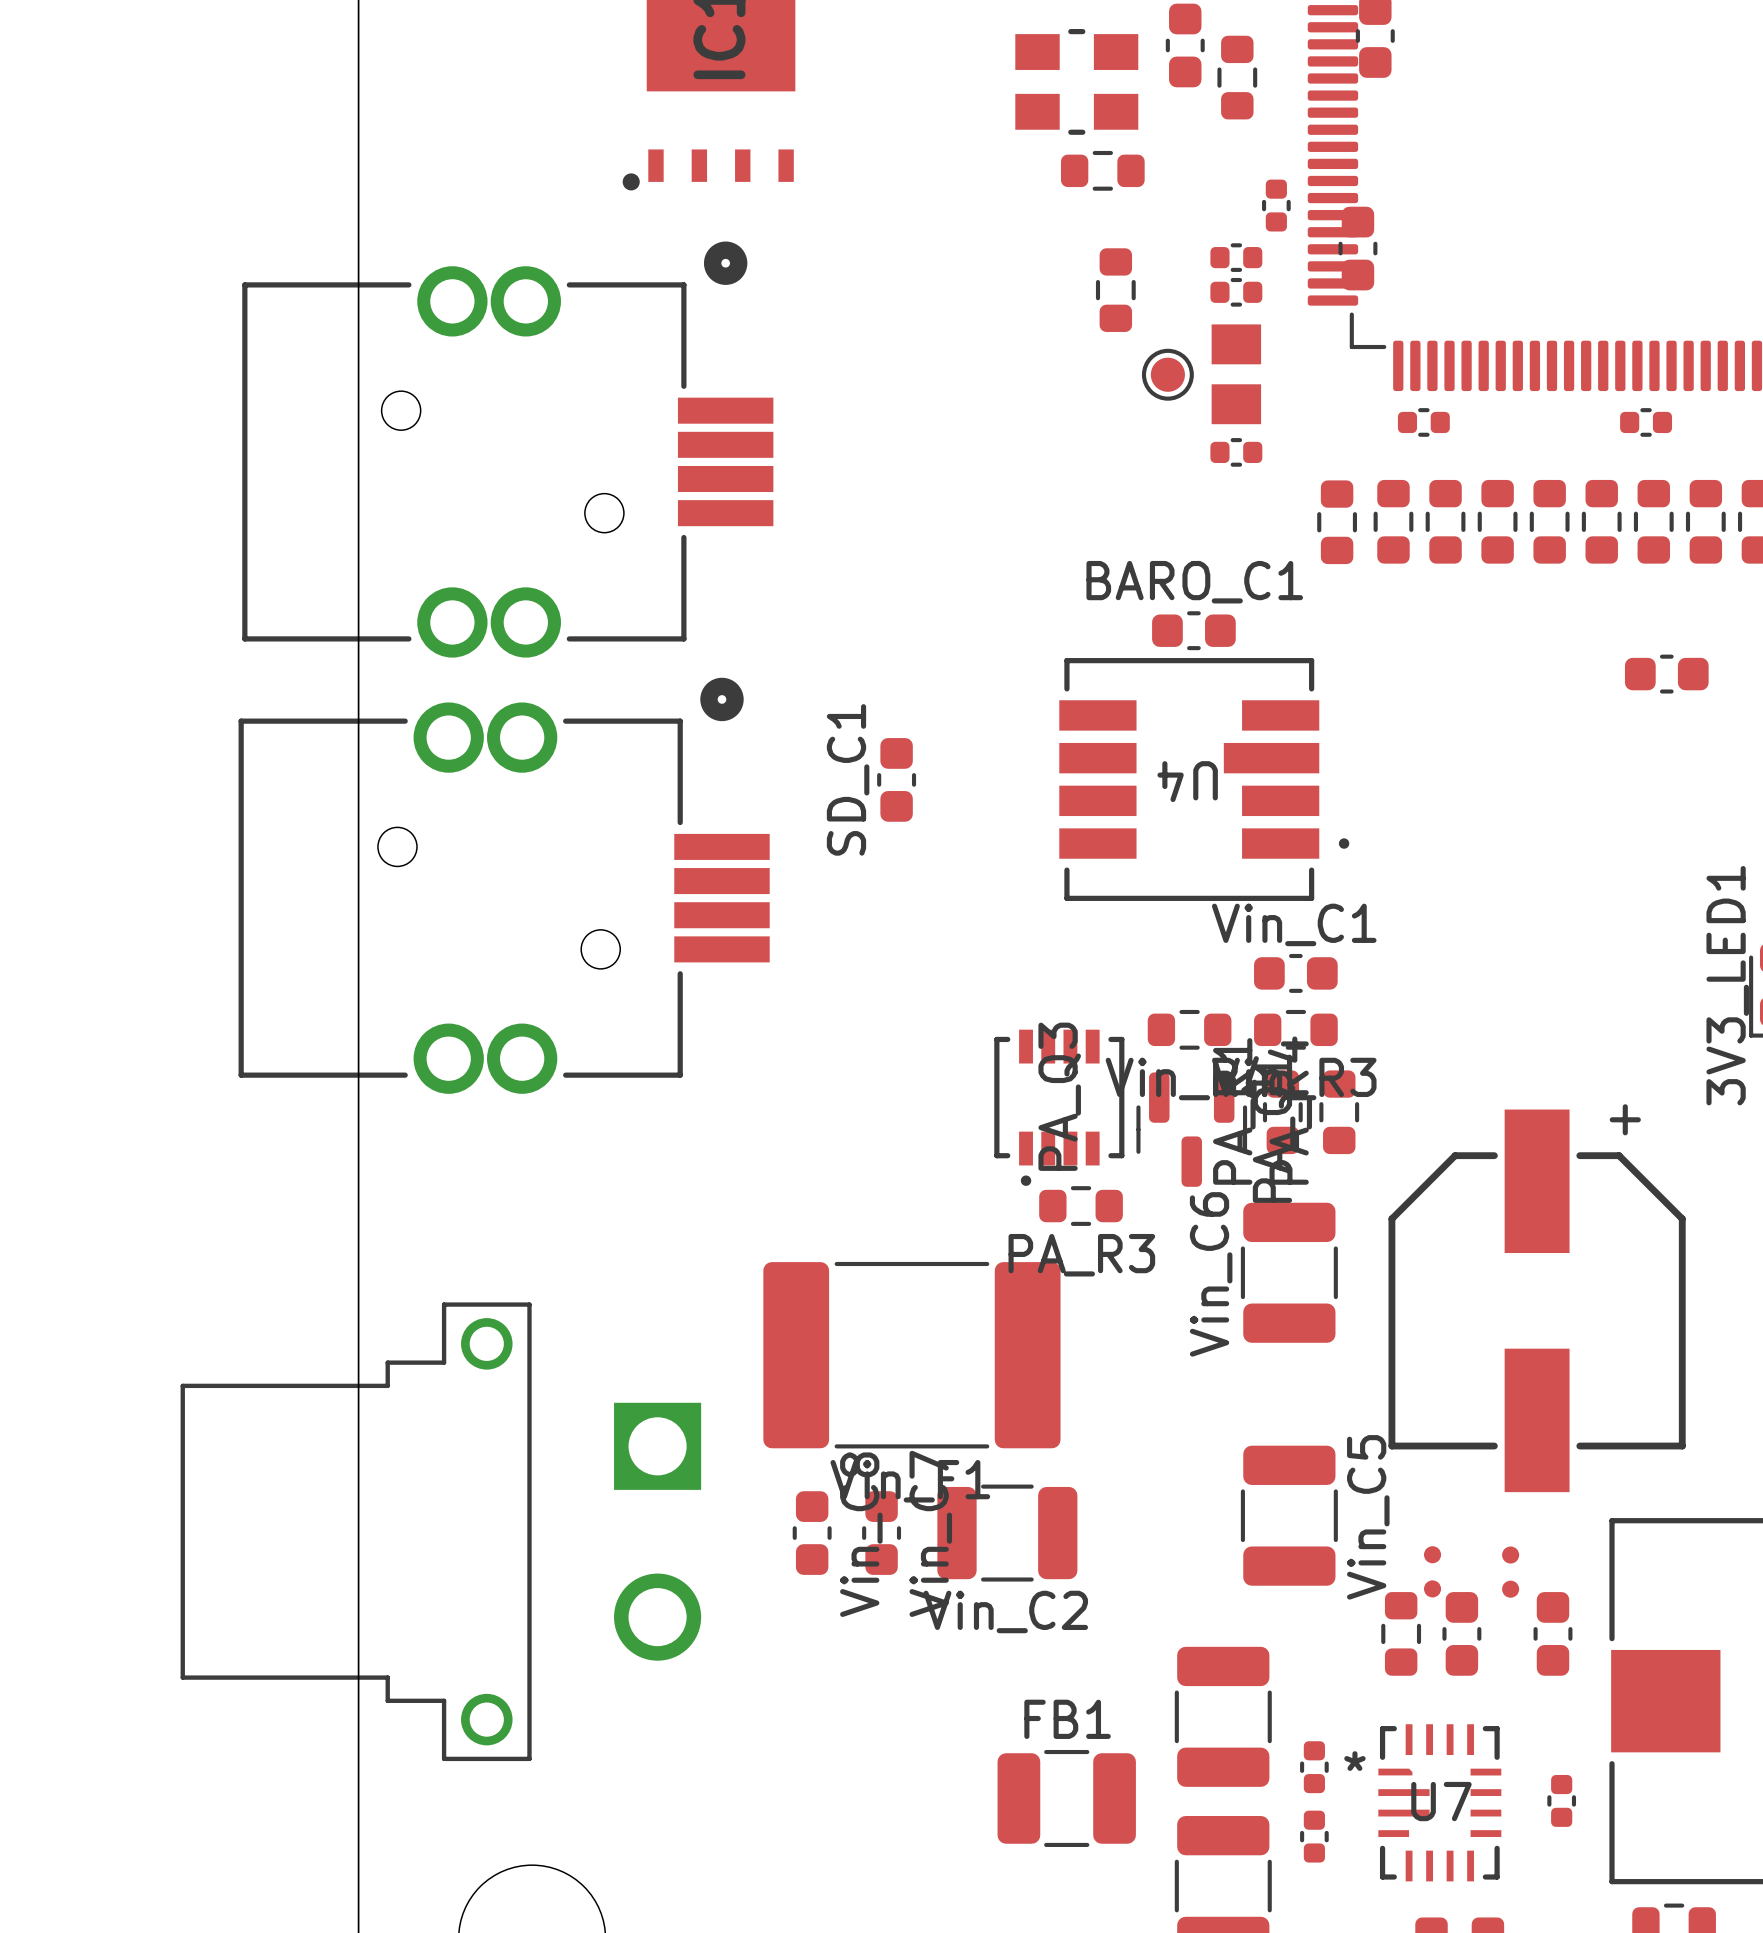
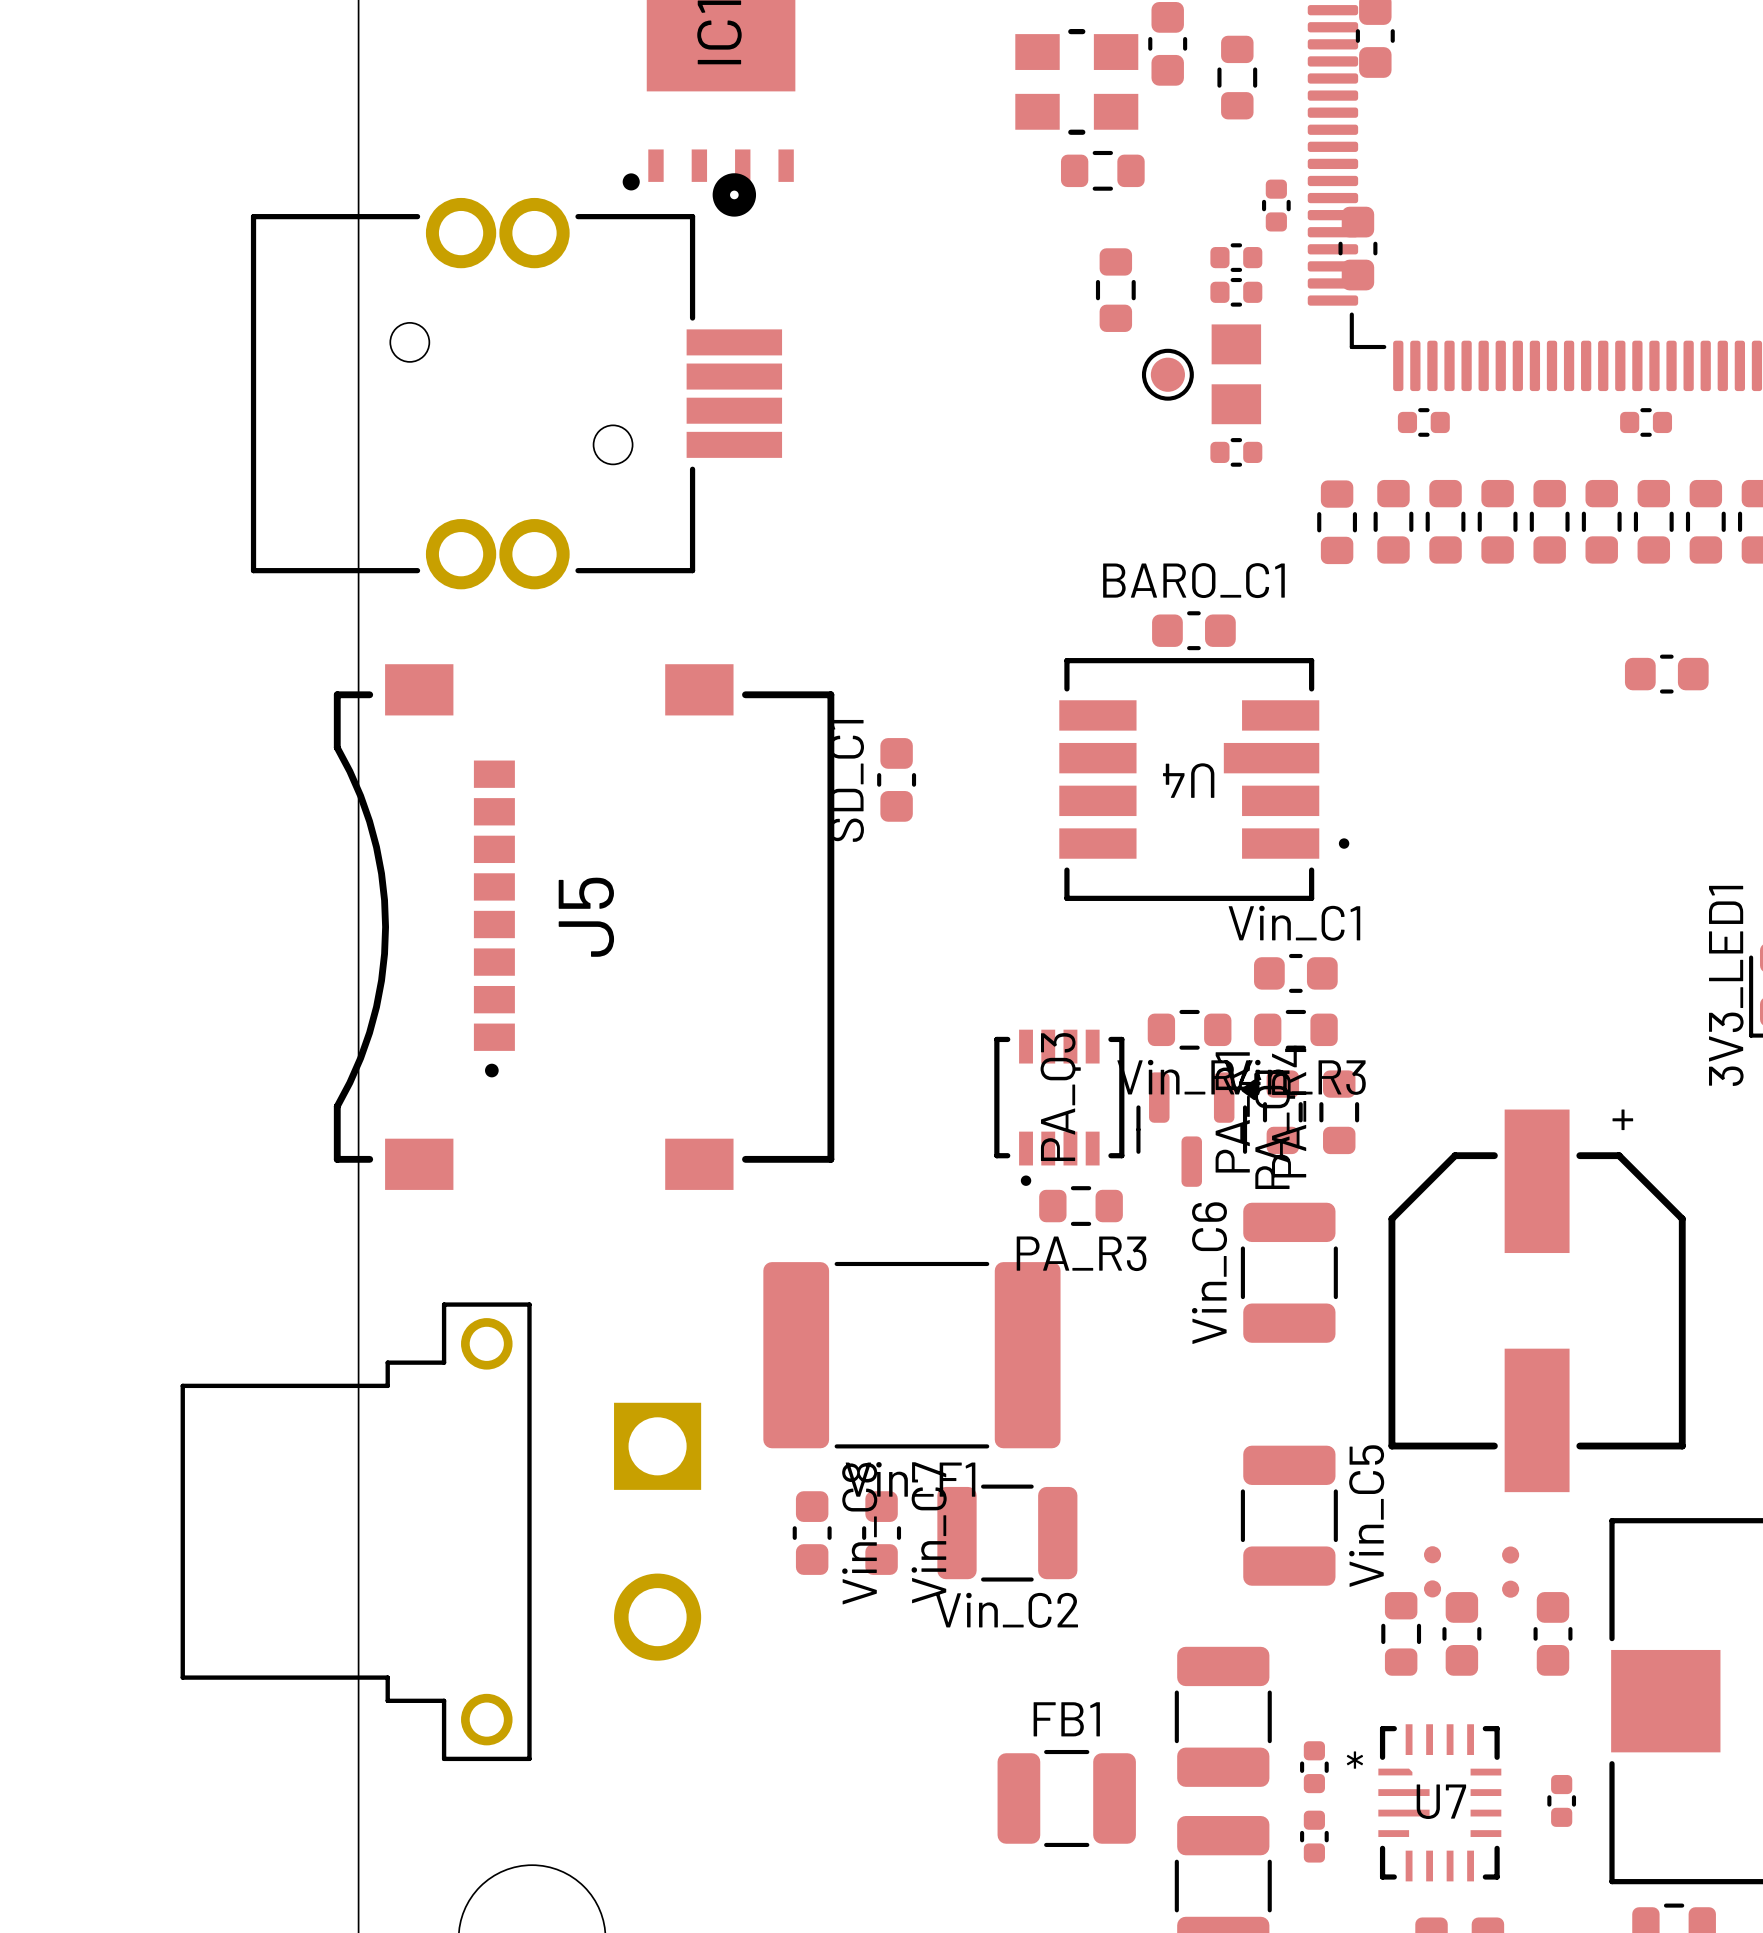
part position: (1185, 45) -> (1167, 43)
part position: (507, 449) -> (516, 381)
part: (504, 885) -> none
J5: none -> (584, 927)

